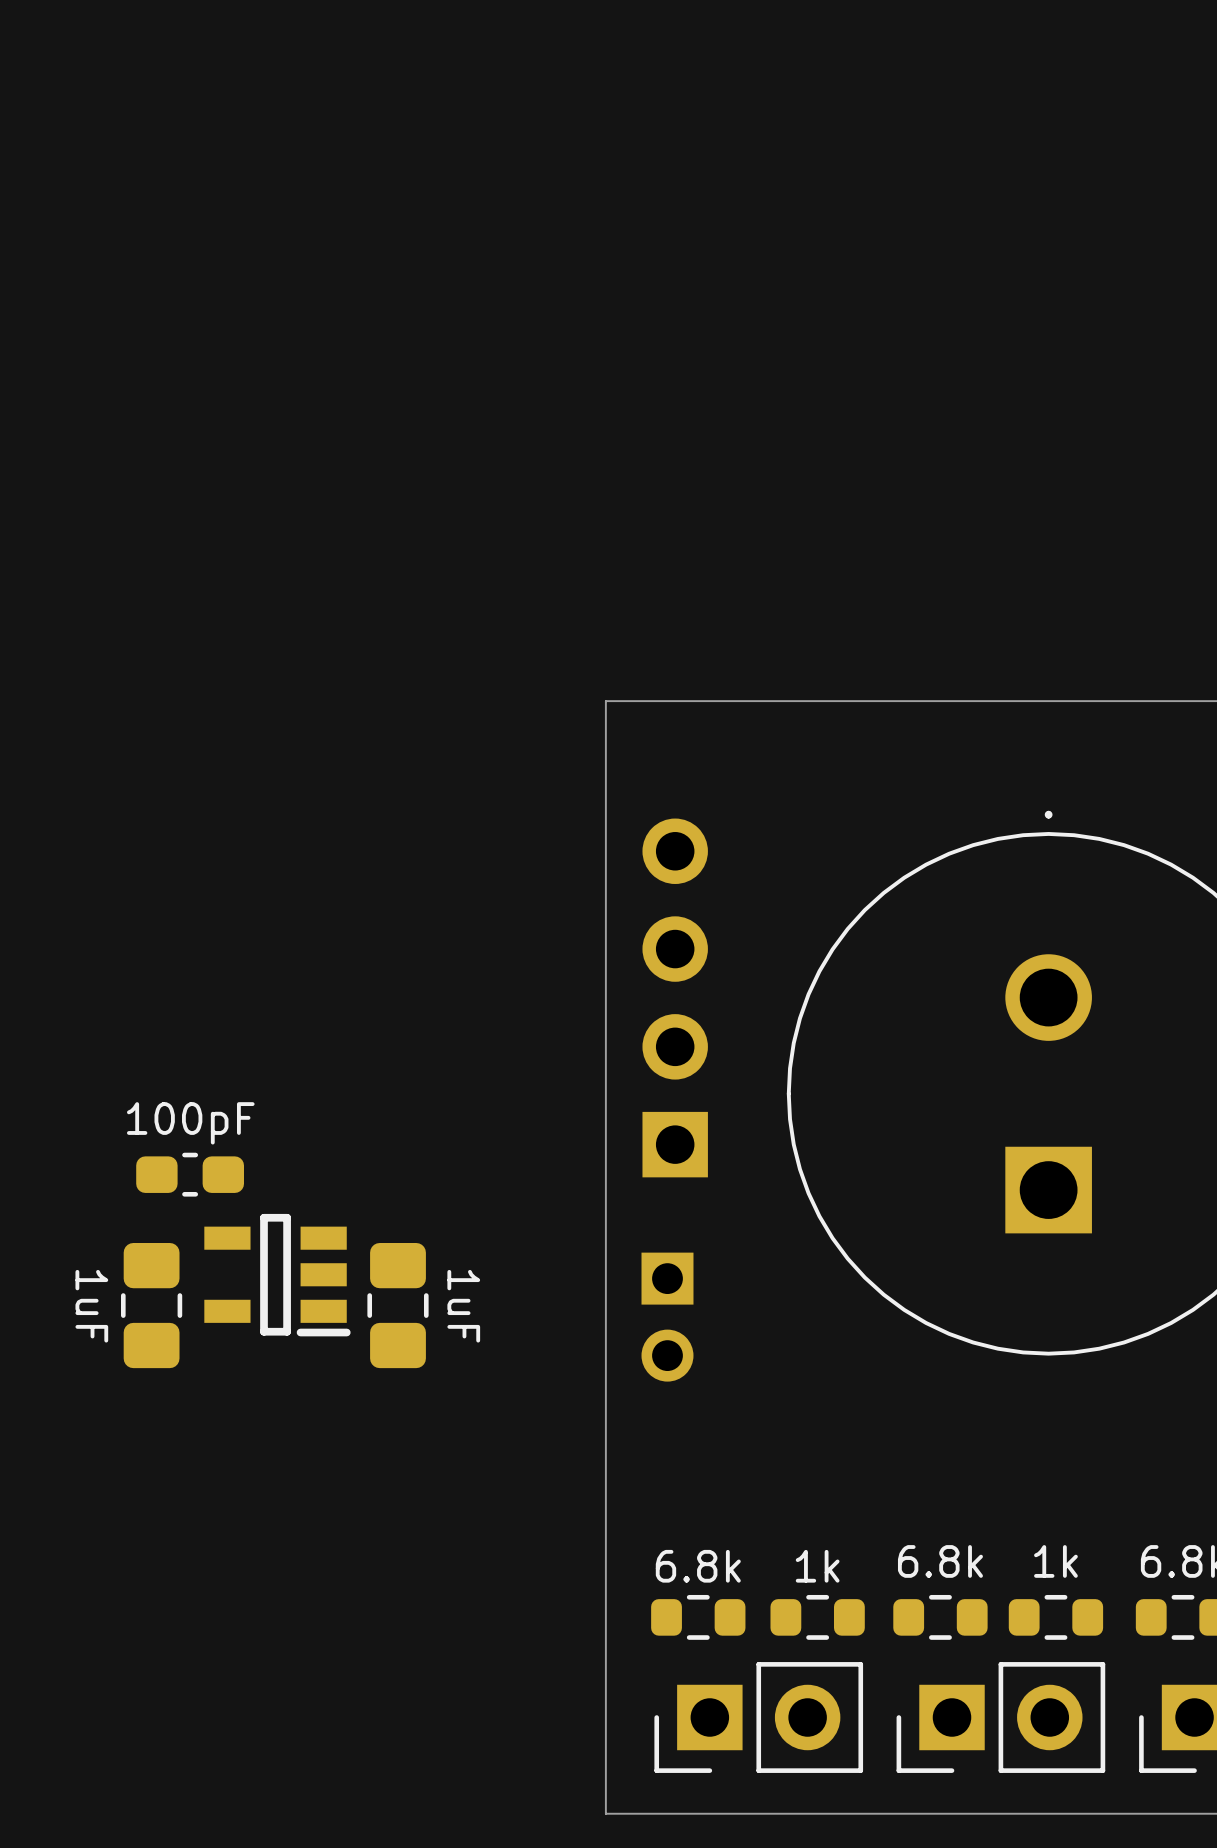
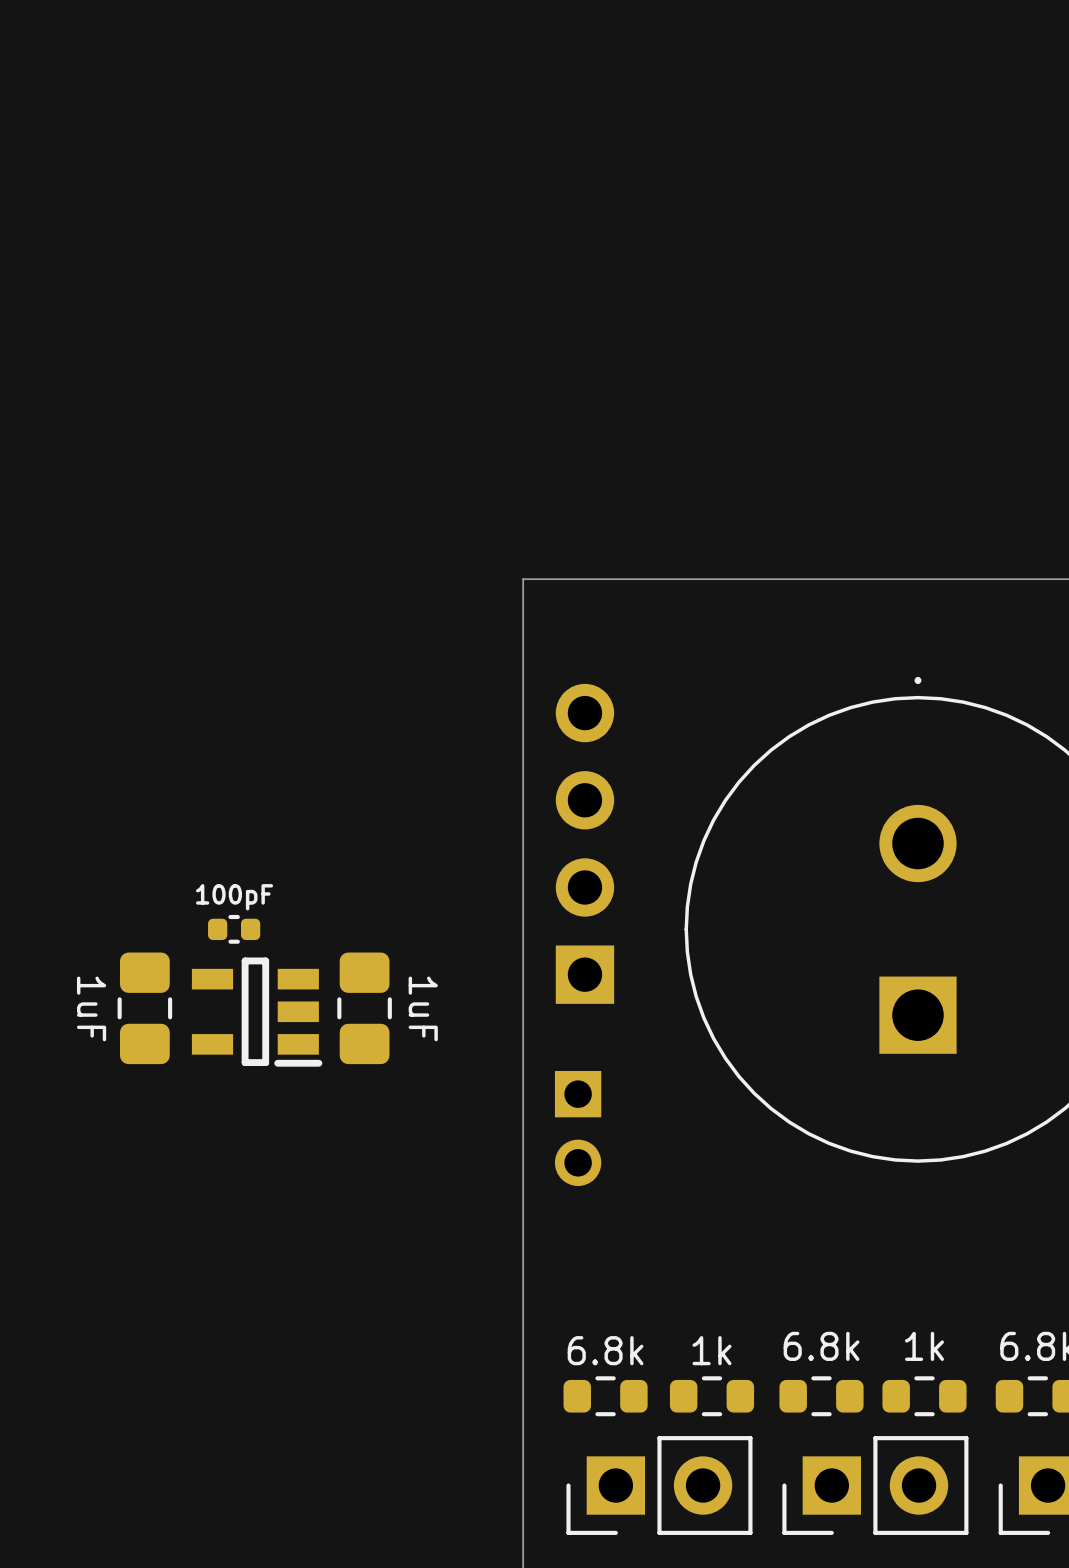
part: none -> 100pF (234, 929)
part value: 100pF (190, 1123) -> 1uF (91, 1008)
part footprint: [136, 1152, 245, 1197] -> [117, 952, 173, 1065]
part position: (277, 1275) -> (257, 1012)
part: 1uF (151, 1305) -> none
part position: (398, 1305) -> (364, 1008)

